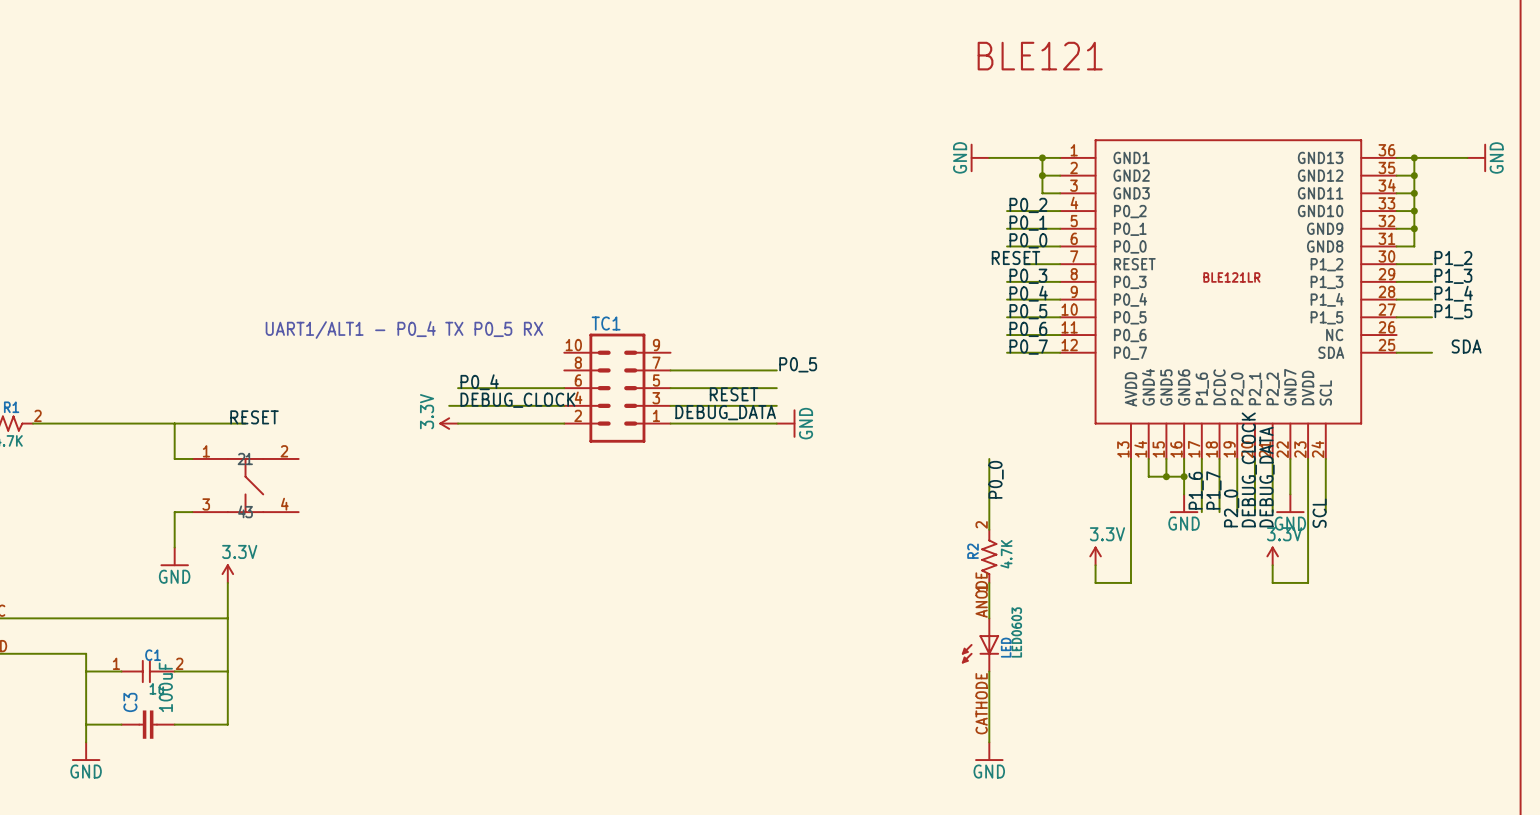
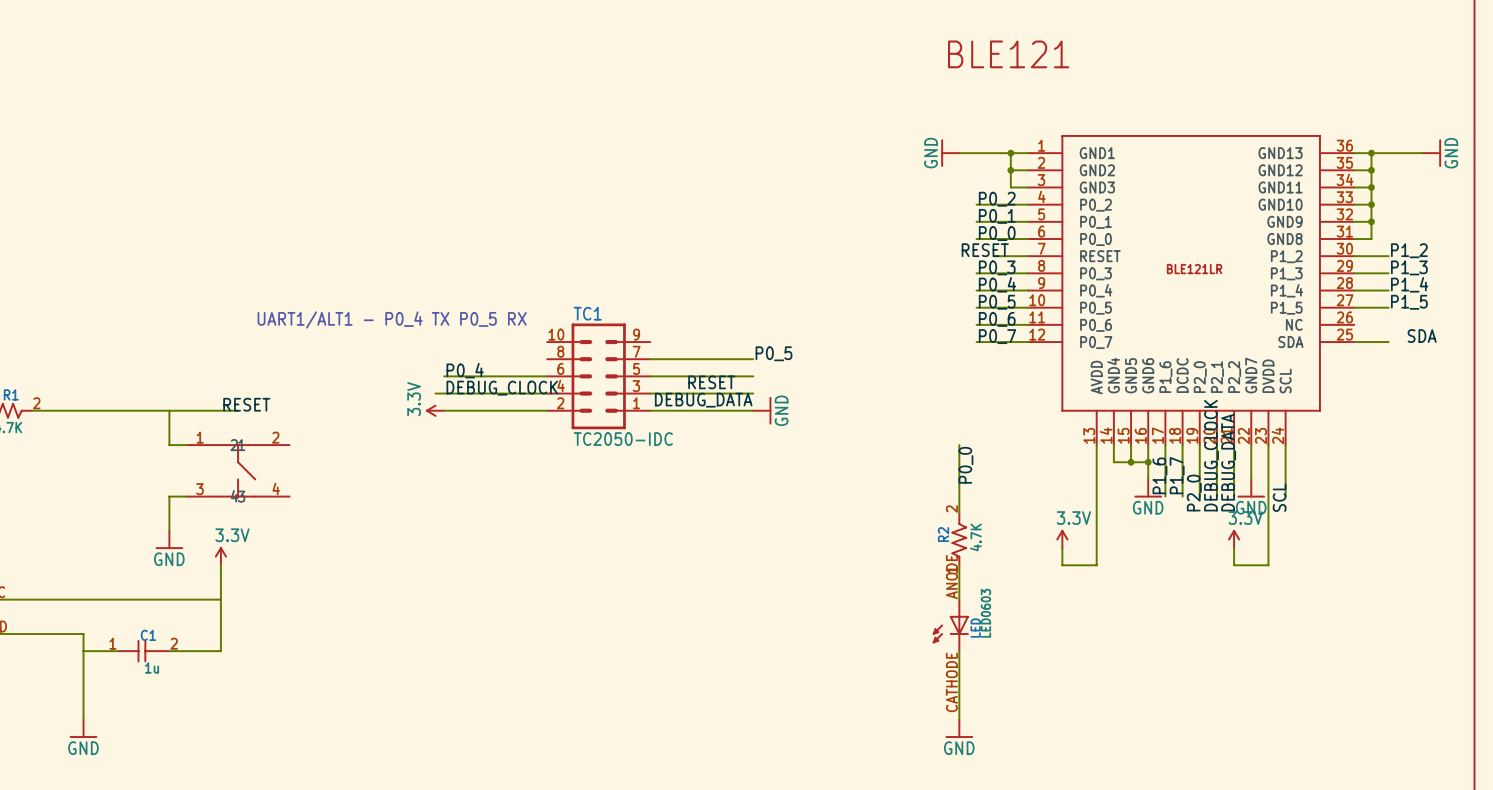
TC1 value: none -> TC2050-IDC (623, 439)
wire: (227, 671) (227, 724) (174, 724) -> none
wire: (86, 724) (121, 724) -> none
C3: 100uF (148, 724) -> none

